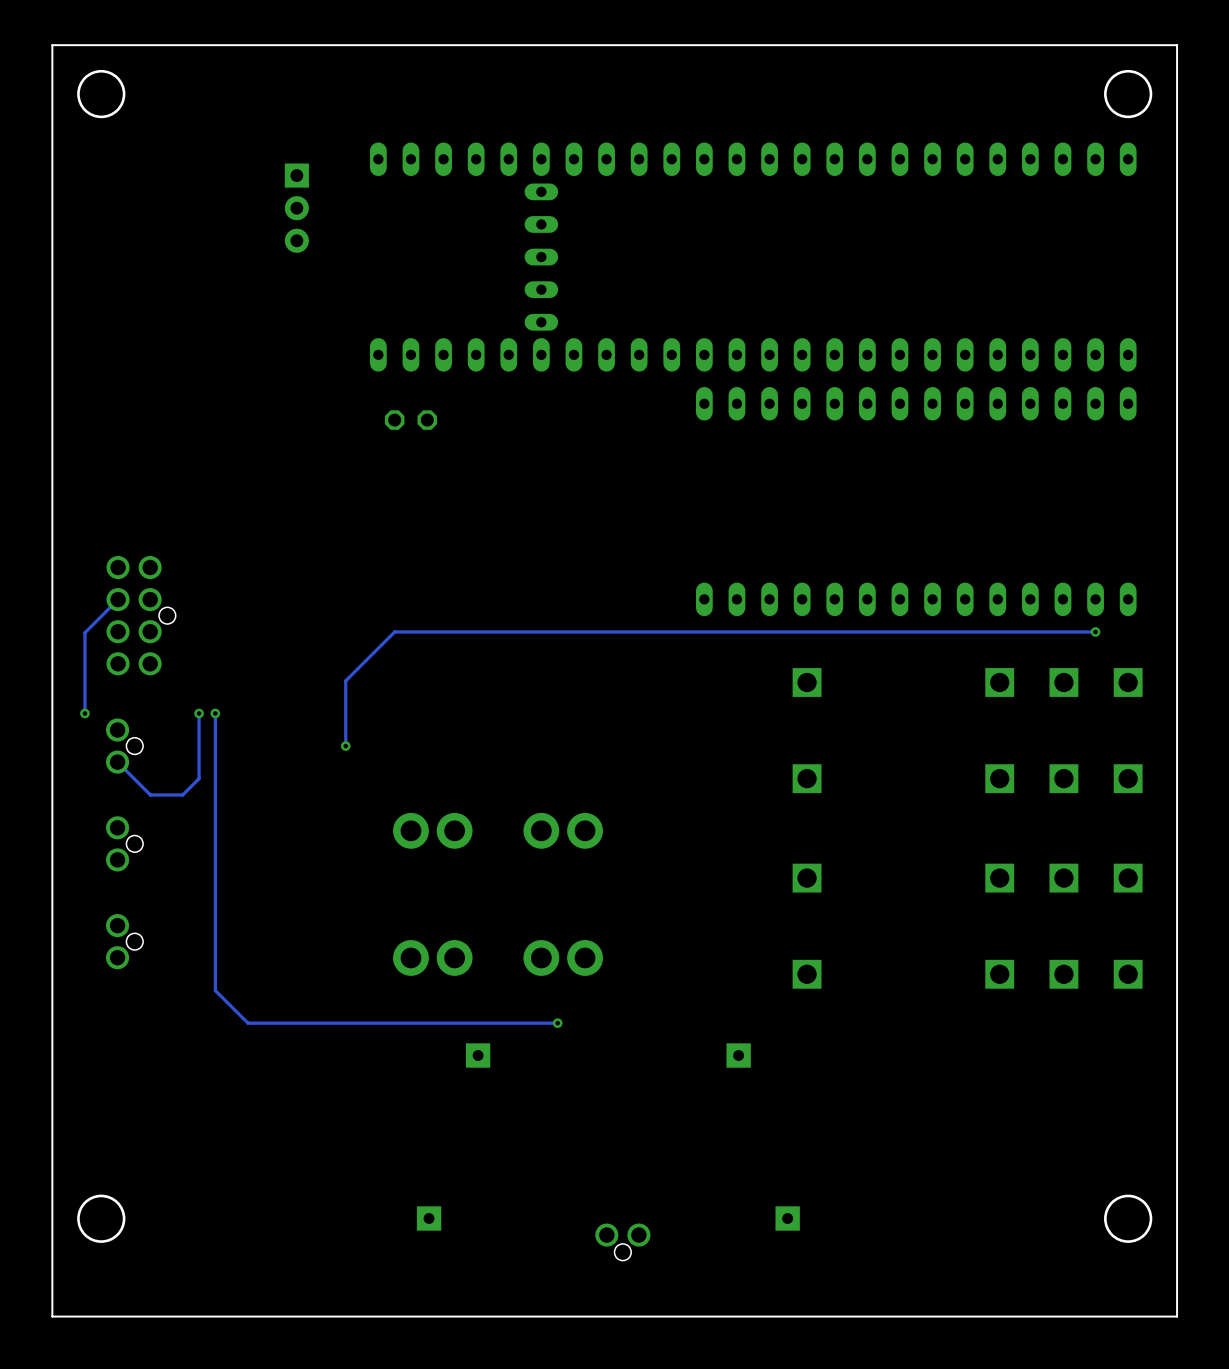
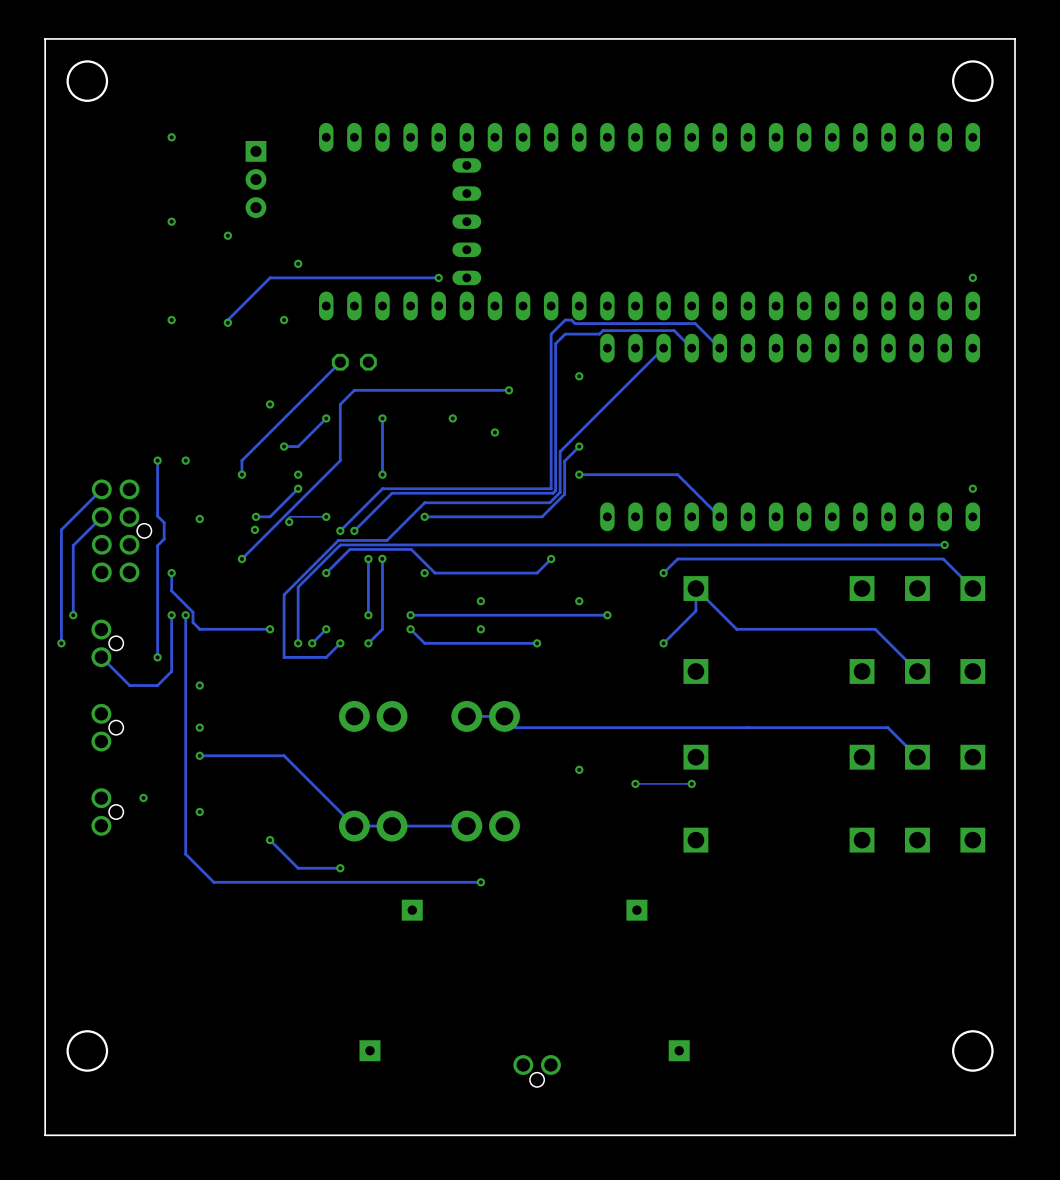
via: none -> (171, 137)
via: none -> (171, 221)
via: none -> (227, 235)
via: none -> (298, 263)
track: none -> (438, 277) (270, 277) (227, 320) (227, 322)
via: none -> (438, 277)
via: none -> (972, 277)
via: none -> (171, 320)
via: none -> (284, 320)
via: none -> (227, 322)
track: none -> (663, 348) (560, 451) (560, 492) (549, 502) (424, 502) (386, 540) (338, 540) (284, 594) (284, 657) (326, 657) (340, 643)
track: none -> (691, 348) (674, 330) (603, 330) (599, 334) (565, 334) (555, 343) (555, 490) (553, 493) (392, 493) (354, 530)
track: none -> (719, 348) (695, 323) (574, 323) (571, 320) (565, 320) (551, 334) (551, 488) (382, 488) (340, 530)
track: none -> (340, 362) (241, 460) (241, 474)
via: none -> (579, 376)
track: none -> (508, 390) (354, 390) (340, 404) (340, 460) (241, 559)
via: none -> (508, 390)
via: none -> (270, 404)
track: none -> (326, 418) (298, 446) (284, 446)
via: none -> (326, 418)
track: none -> (382, 418) (382, 474)
via: none -> (382, 418)
via: none -> (452, 418)
via: none -> (494, 432)
via: none -> (284, 446)
track: none -> (579, 446) (564, 461) (564, 494) (542, 516) (424, 516)
via: none -> (579, 446)
track: none -> (157, 460) (157, 516) (164, 522) (164, 539) (157, 545) (157, 657)
via: none -> (157, 460)
via: none -> (185, 460)
via: none -> (241, 474)
via: none -> (298, 474)
via: none -> (382, 474)
track: none -> (579, 474) (677, 474) (719, 516)
via: none -> (579, 474)
track: none -> (298, 488) (270, 516) (255, 516)
via: none -> (298, 488)
via: none -> (972, 488)
track: none -> (101, 489) (61, 529) (61, 643)
via: none -> (255, 516)
track: none -> (326, 516) (289, 516) (286, 519) (289, 521)
via: none -> (326, 516)
via: none -> (424, 516)
via: none -> (199, 519)
via: none -> (289, 521)
via: none -> (254, 529)
via: none -> (340, 530)
via: none -> (354, 530)
via: none -> (241, 559)
track: none -> (368, 559) (368, 615)
via: none -> (368, 559)
track: none -> (382, 558) (382, 629) (368, 643)
via: none -> (382, 558)
track: none -> (551, 559) (537, 573) (434, 573) (411, 549) (349, 549) (326, 573)
via: none -> (551, 559)
track: none -> (171, 573) (171, 590) (192, 612) (192, 622) (199, 629) (270, 629)
via: none -> (171, 573)
via: none -> (326, 573)
via: none -> (424, 573)
track: none -> (663, 573) (677, 559) (943, 559) (972, 588)
via: none -> (663, 573)
via: none -> (480, 601)
via: none -> (579, 601)
via: none -> (368, 615)
via: none -> (410, 615)
track: none -> (607, 615) (410, 615)
via: none -> (607, 615)
via: none -> (270, 629)
track: none -> (326, 629) (312, 643)
via: none -> (326, 629)
track: none -> (410, 629) (424, 643) (537, 643)
via: none -> (410, 629)
via: none -> (480, 629)
via: none -> (61, 643)
via: none -> (312, 643)
via: none -> (340, 643)
via: none -> (368, 643)
via: none -> (537, 643)
track: none -> (663, 643) (695, 611) (695, 588) (736, 629) (875, 629) (917, 671)
via: none -> (663, 643)
via: none -> (157, 657)
via: none -> (199, 685)
track: none -> (466, 716) (504, 716) (515, 727) (887, 727) (917, 757)
via: none -> (199, 727)
track: none -> (199, 755) (284, 755) (354, 826) (466, 826)
via: none -> (199, 755)
via: none -> (579, 769)
via: none -> (635, 783)
track: none -> (691, 783) (635, 783)
via: none -> (691, 783)
via: none -> (143, 797)
via: none -> (199, 812)
track: none -> (270, 840) (298, 868) (340, 868)
via: none -> (270, 840)
via: none -> (340, 868)

